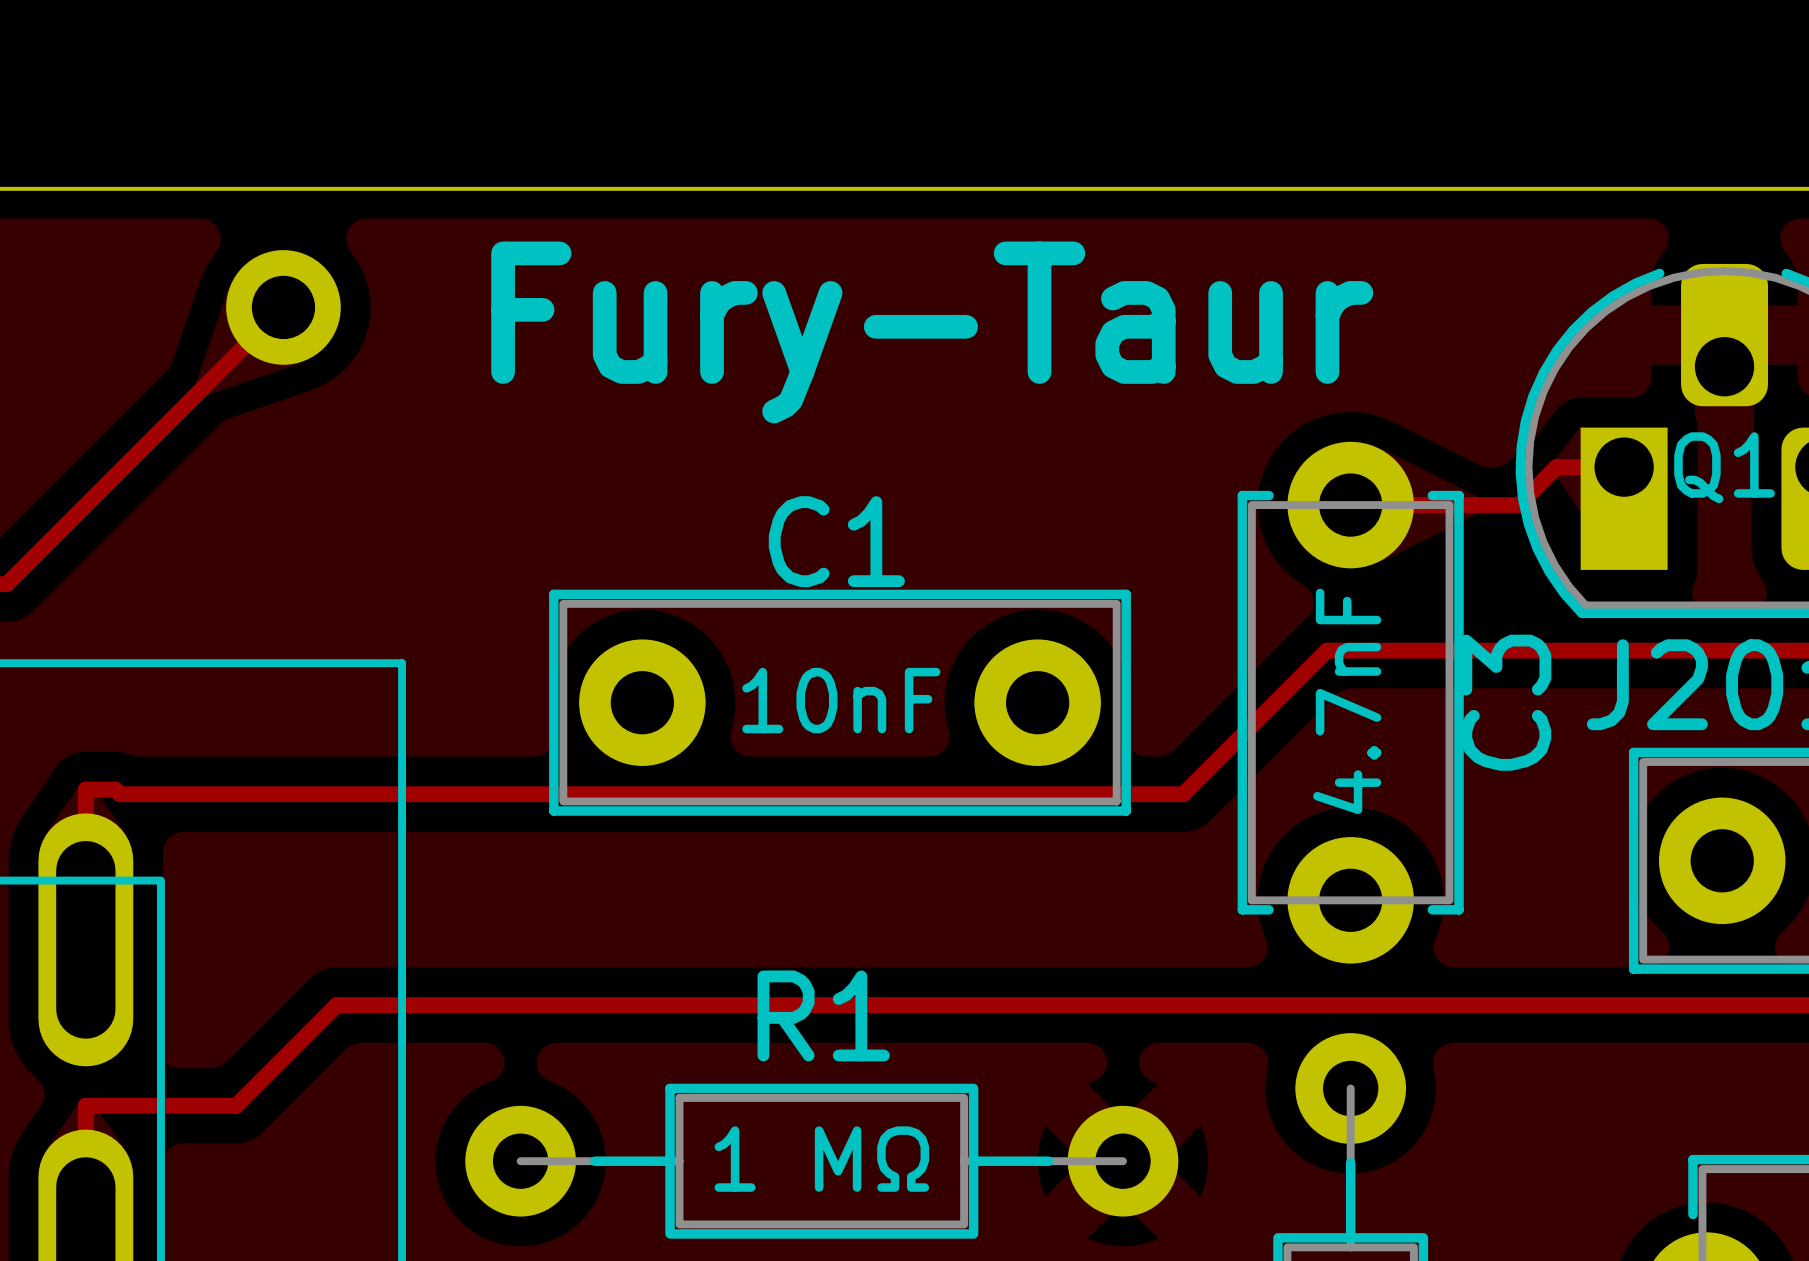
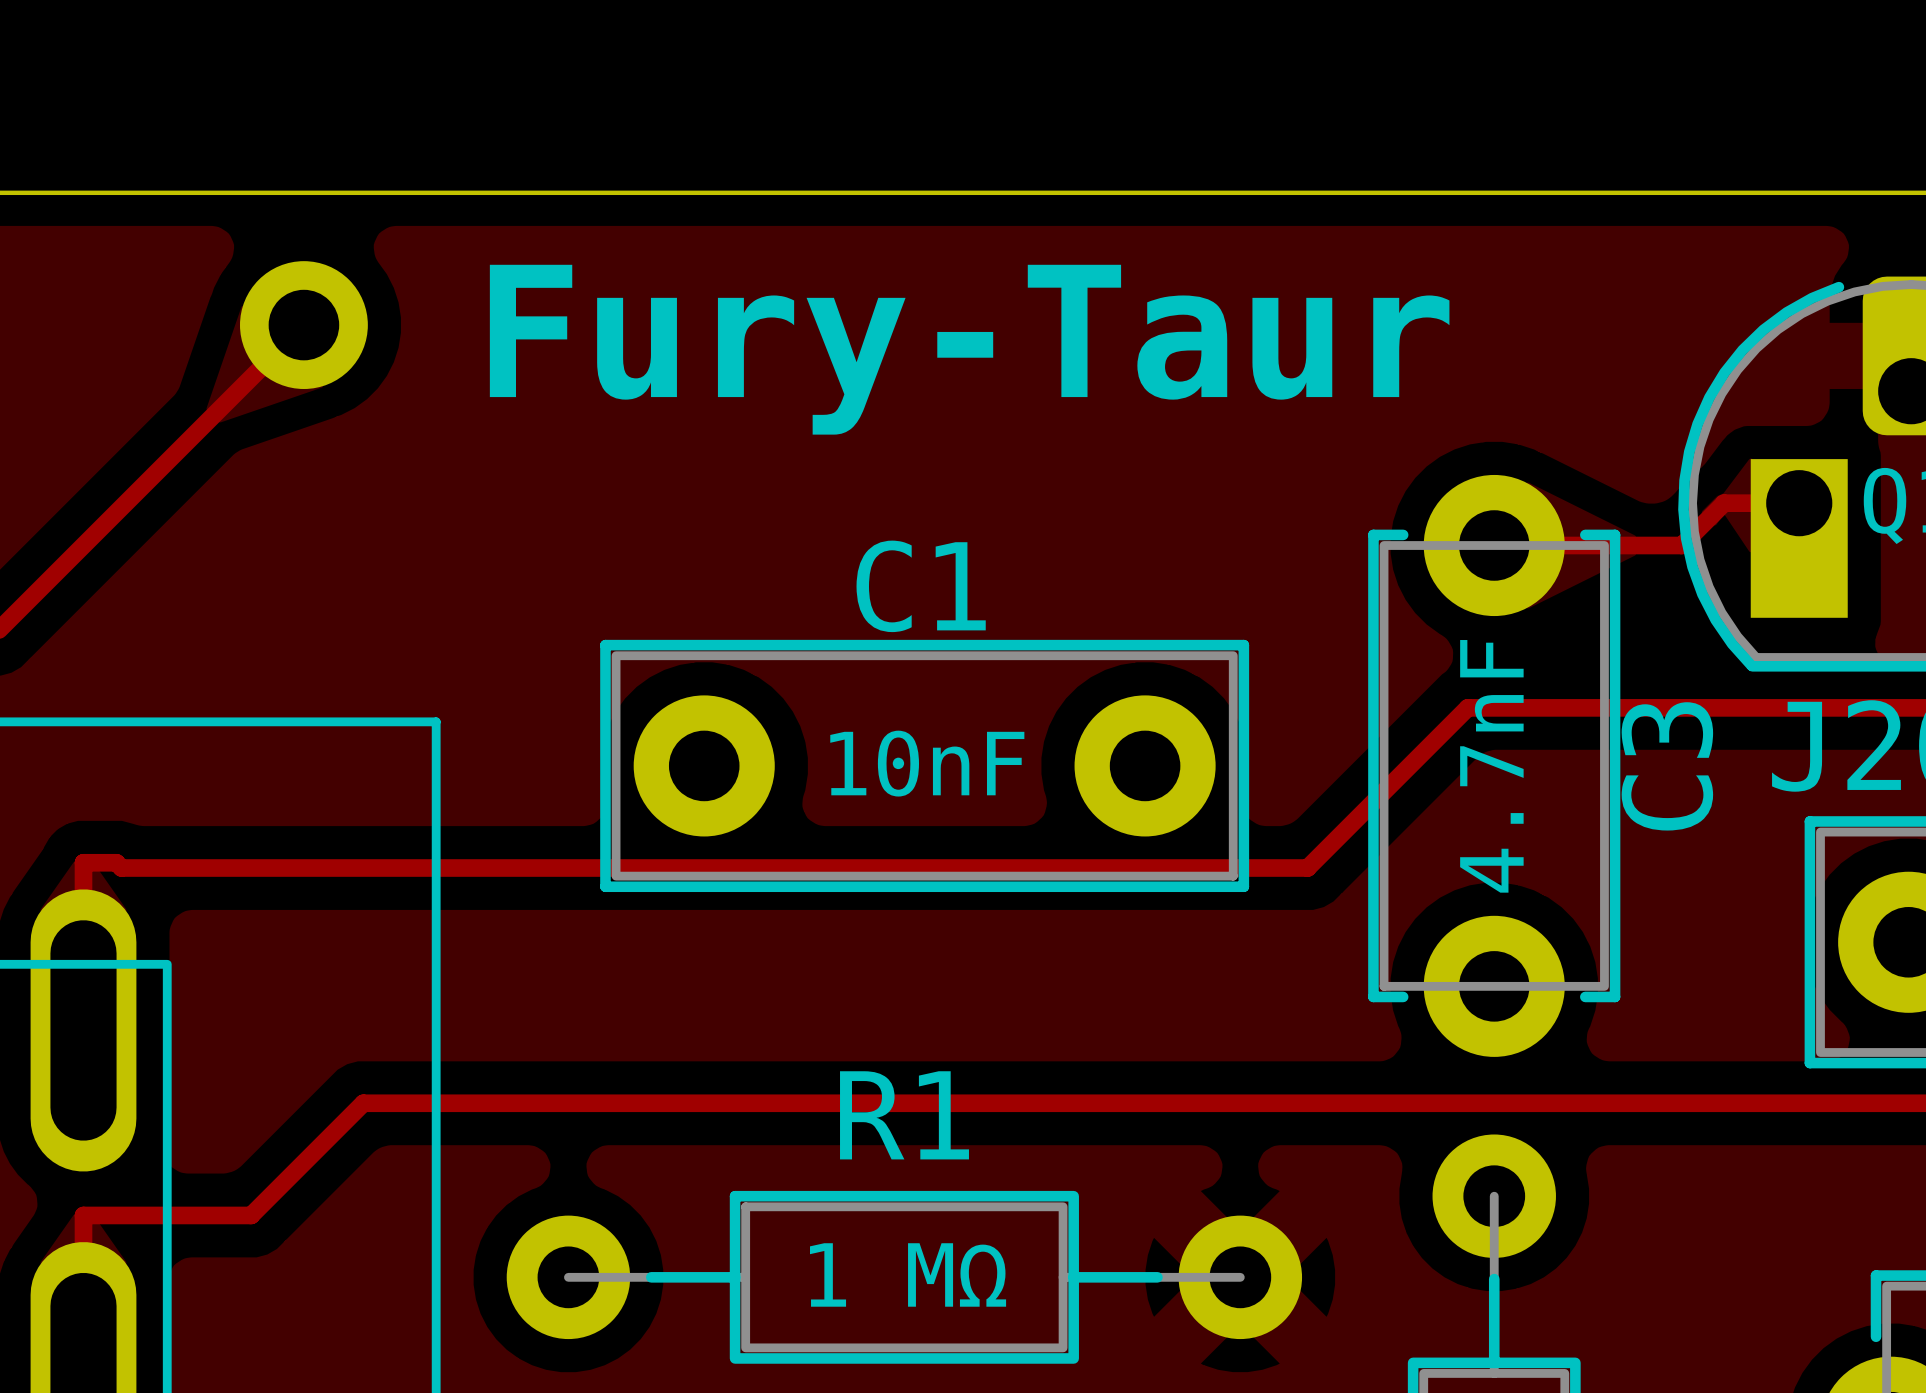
text position: Fury-Taur (932, 332) -> Fury-Taur (969, 349)

